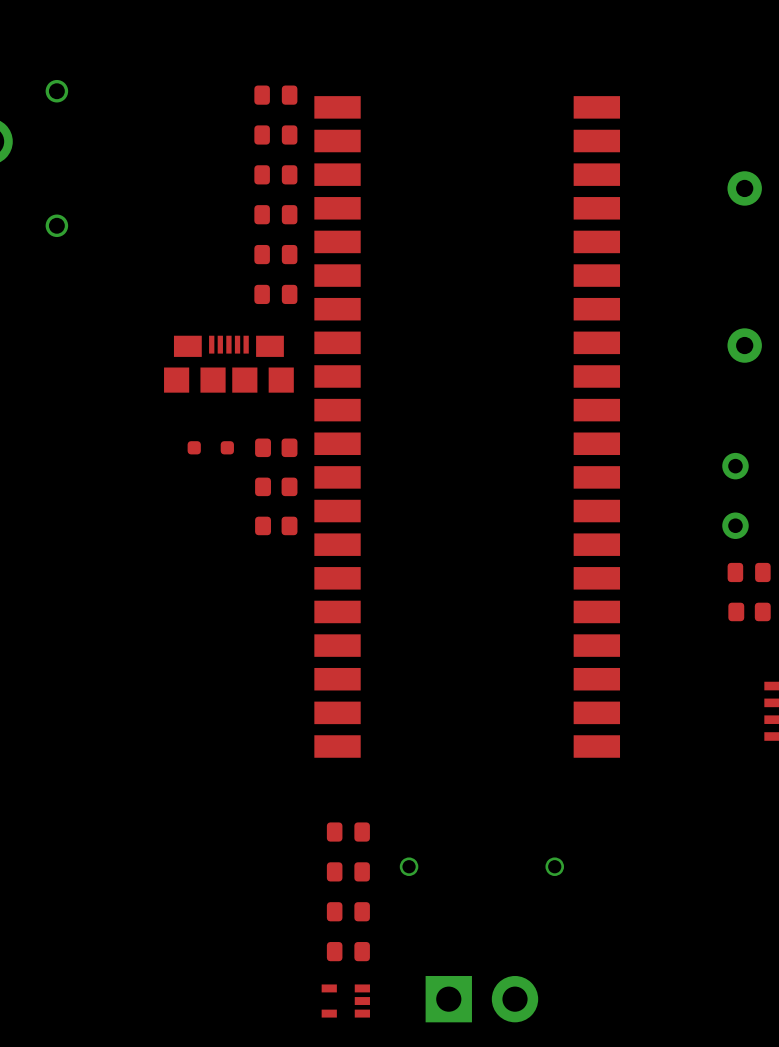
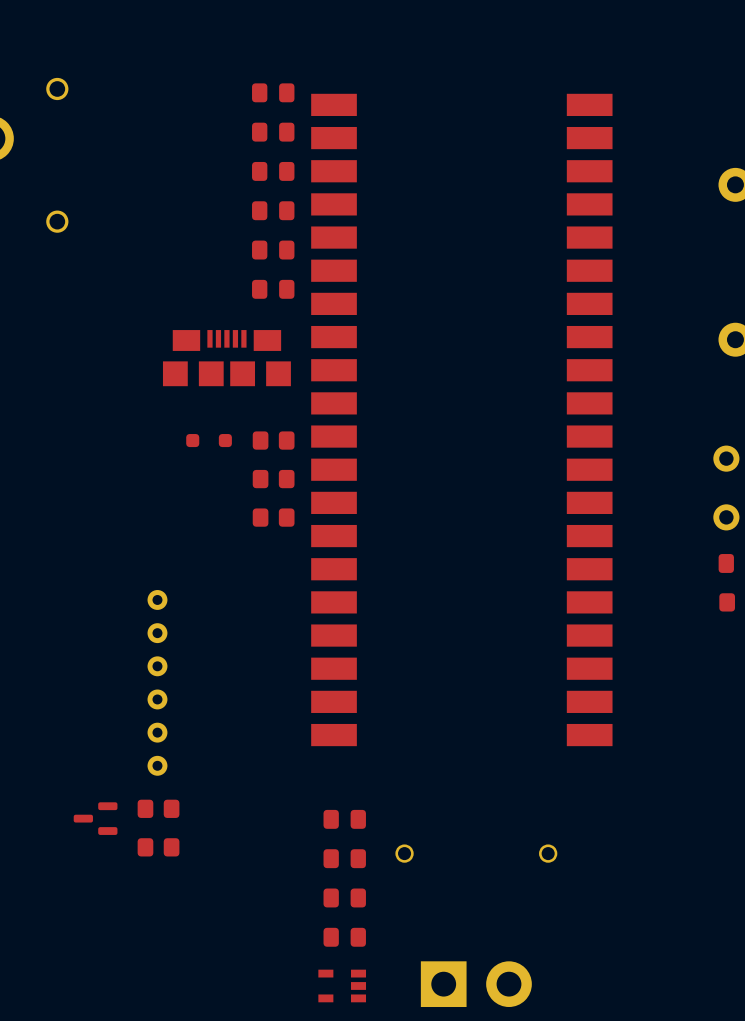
part: none -> (157, 682)
part: none -> (158, 808)
part: none -> (95, 818)
part: none -> (158, 847)

